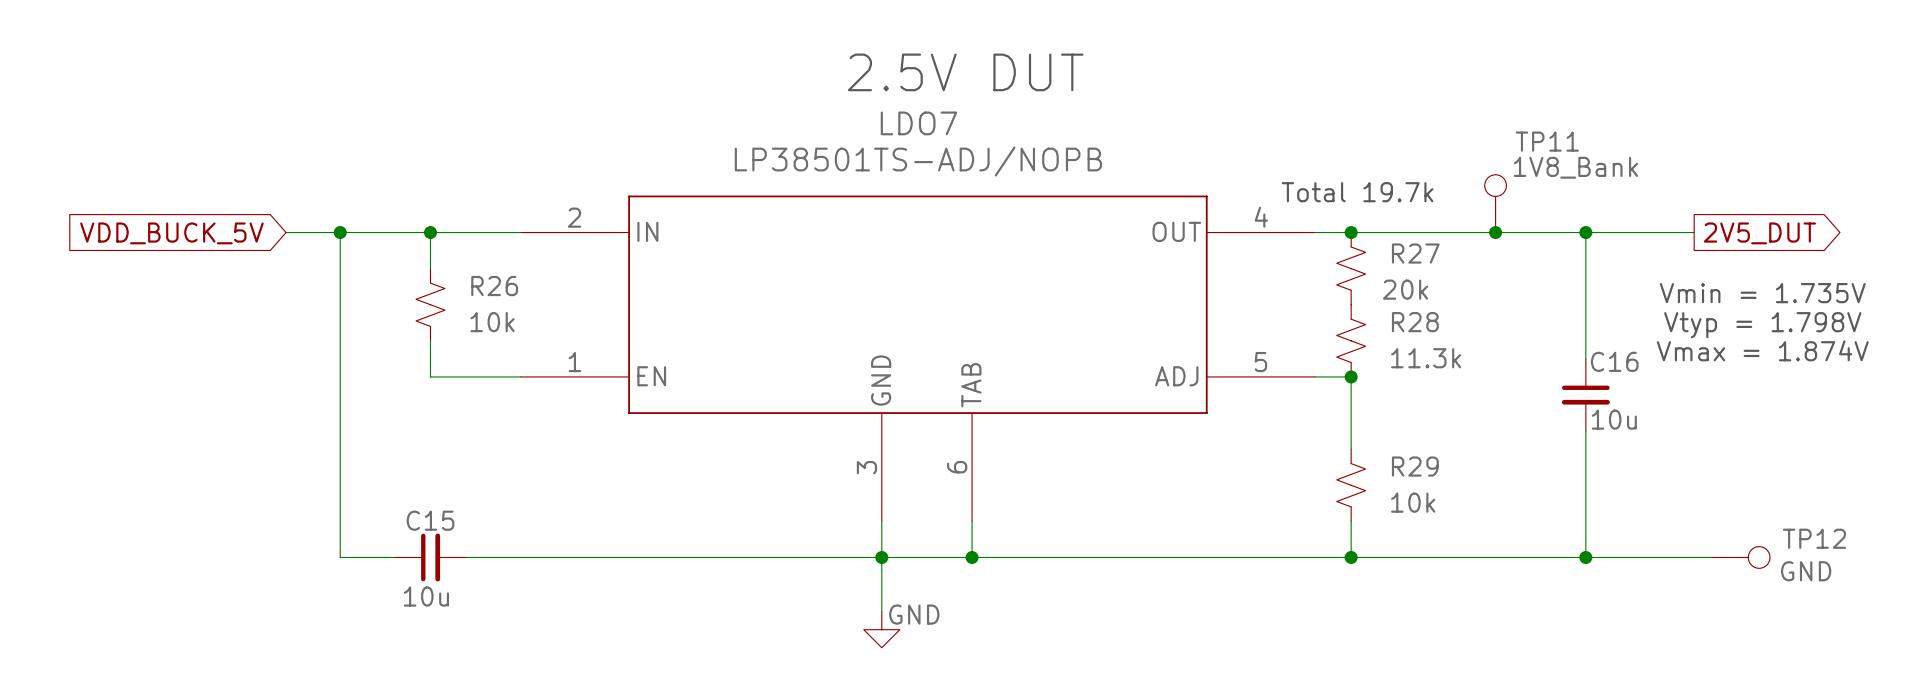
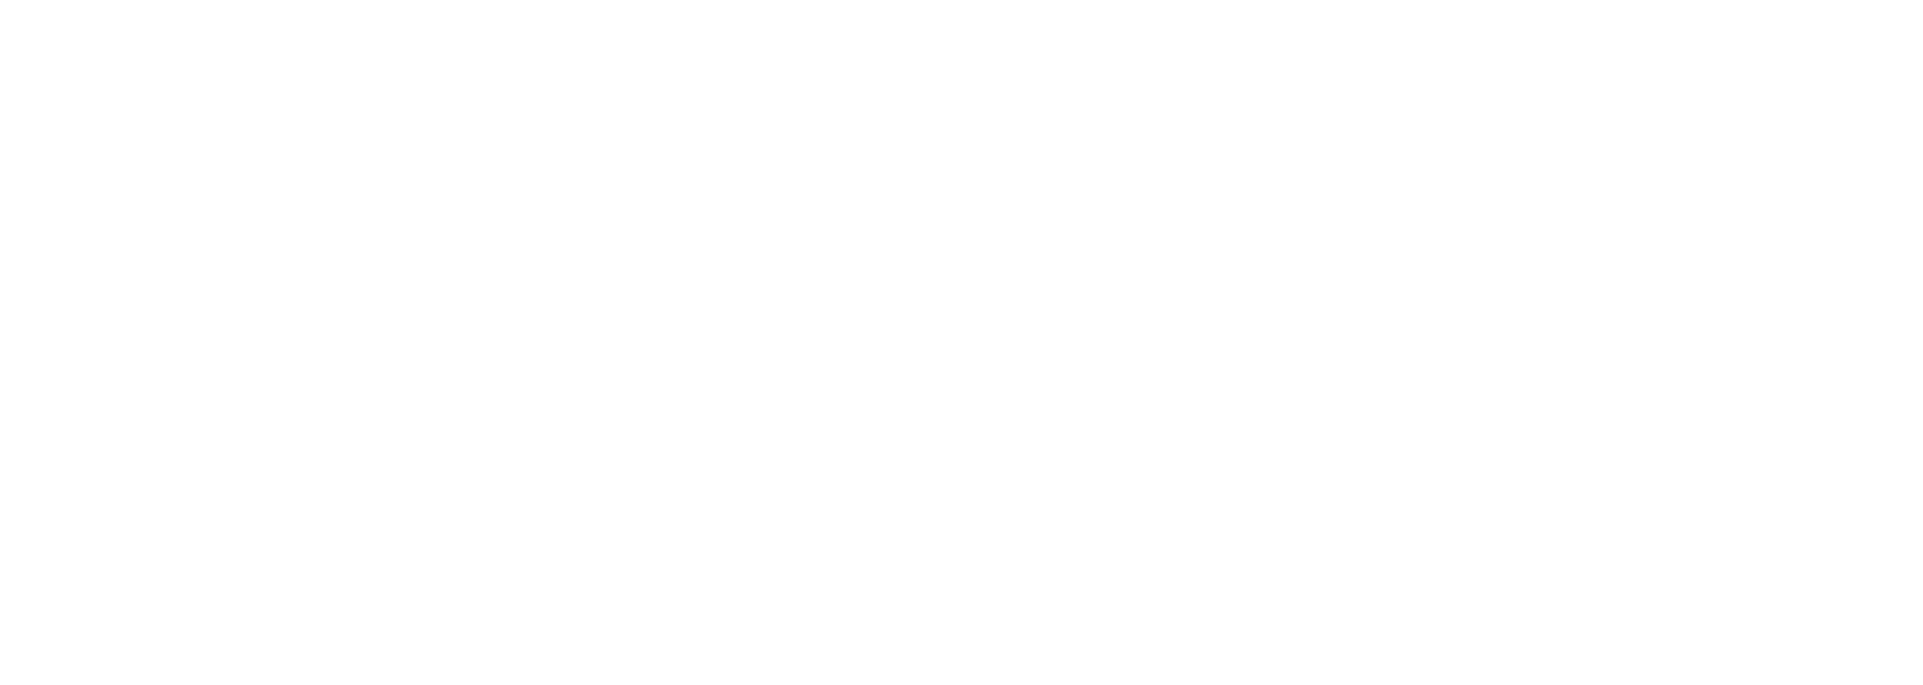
text: 2.5V DUT (965, 72) -> none
text: Total 19.7k (1357, 192) -> none
TP11: 1V8_Bank (1495, 203) -> none
wire: (286, 232) (520, 232) -> none
wire: (340, 232) (340, 557) (394, 557) -> none
junction: (340, 232) -> none
wire: (430, 232) (430, 268) -> none
junction: (430, 232) -> none
wire: (1315, 232) (1694, 232) -> none
junction: (1351, 232) -> none
junction: (1495, 232) -> none
wire: (1585, 232) (1585, 358) -> none
junction: (1585, 232) -> none
global label: VDD_BUCK_5V (171, 233) -> none
global label: 2V5_DUT (1759, 233) -> none
R27: 20k (1351, 268) -> none
text: Vmin = 1.735V (1762, 293) -> none
R26: 10k (430, 304) -> none
text: Vtyp = 1.798V (1762, 325) -> none
wire: (430, 340) (430, 376) (520, 376) -> none
R28: 11.3k (1351, 340) -> none
text: Vmax = 1.874V (1762, 350) -> none
LDO7: LP38501TS-ADJ/NOPB (917, 358) -> none
wire: (1315, 376) (1351, 376) (1351, 449) -> none
junction: (1351, 376) -> none
C16: 10u (1585, 395) -> none
wire: (1585, 431) (1585, 557) -> none
R29: 10k (1351, 485) -> none
wire: (881, 521) (881, 611) -> none
wire: (972, 521) (972, 557) -> none
wire: (1351, 521) (1351, 557) -> none
C15: 10u (430, 557) -> none
wire: (466, 557) (1712, 557) -> none
junction: (881, 557) -> none
junction: (972, 557) -> none
junction: (1351, 557) -> none
junction: (1585, 557) -> none
TP12: GND (1741, 557) -> none
power symbol: GND (881, 629) -> none

